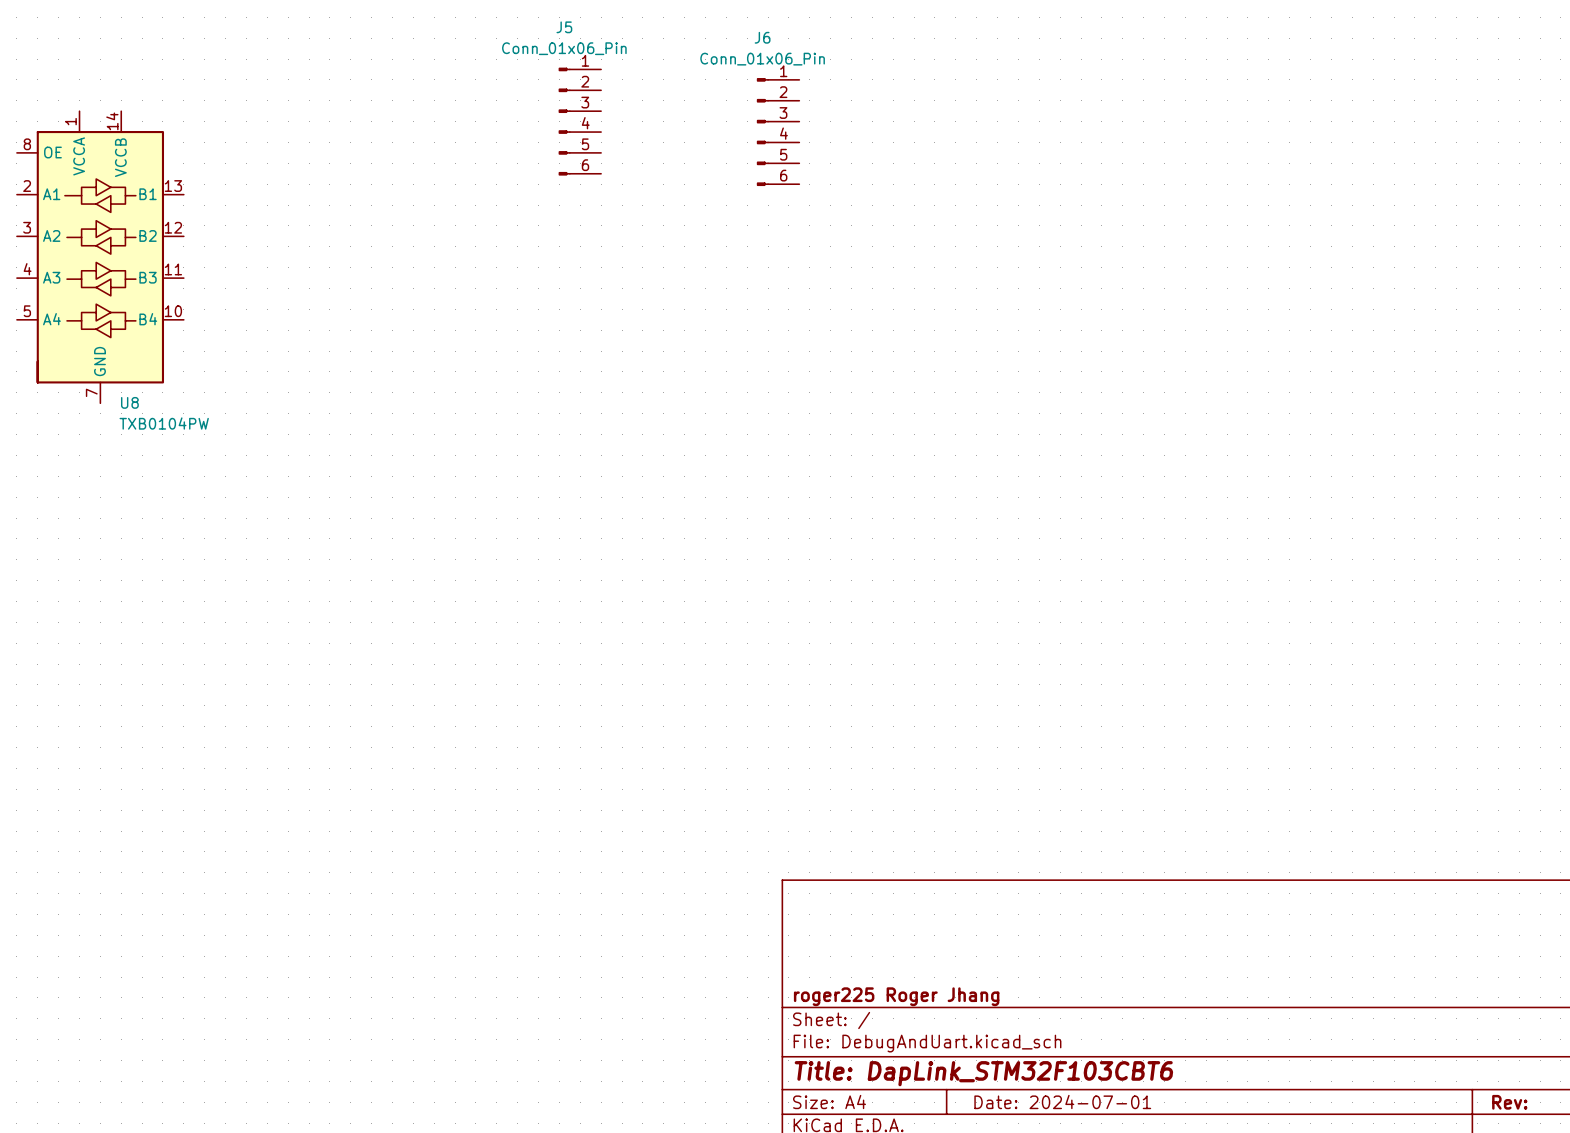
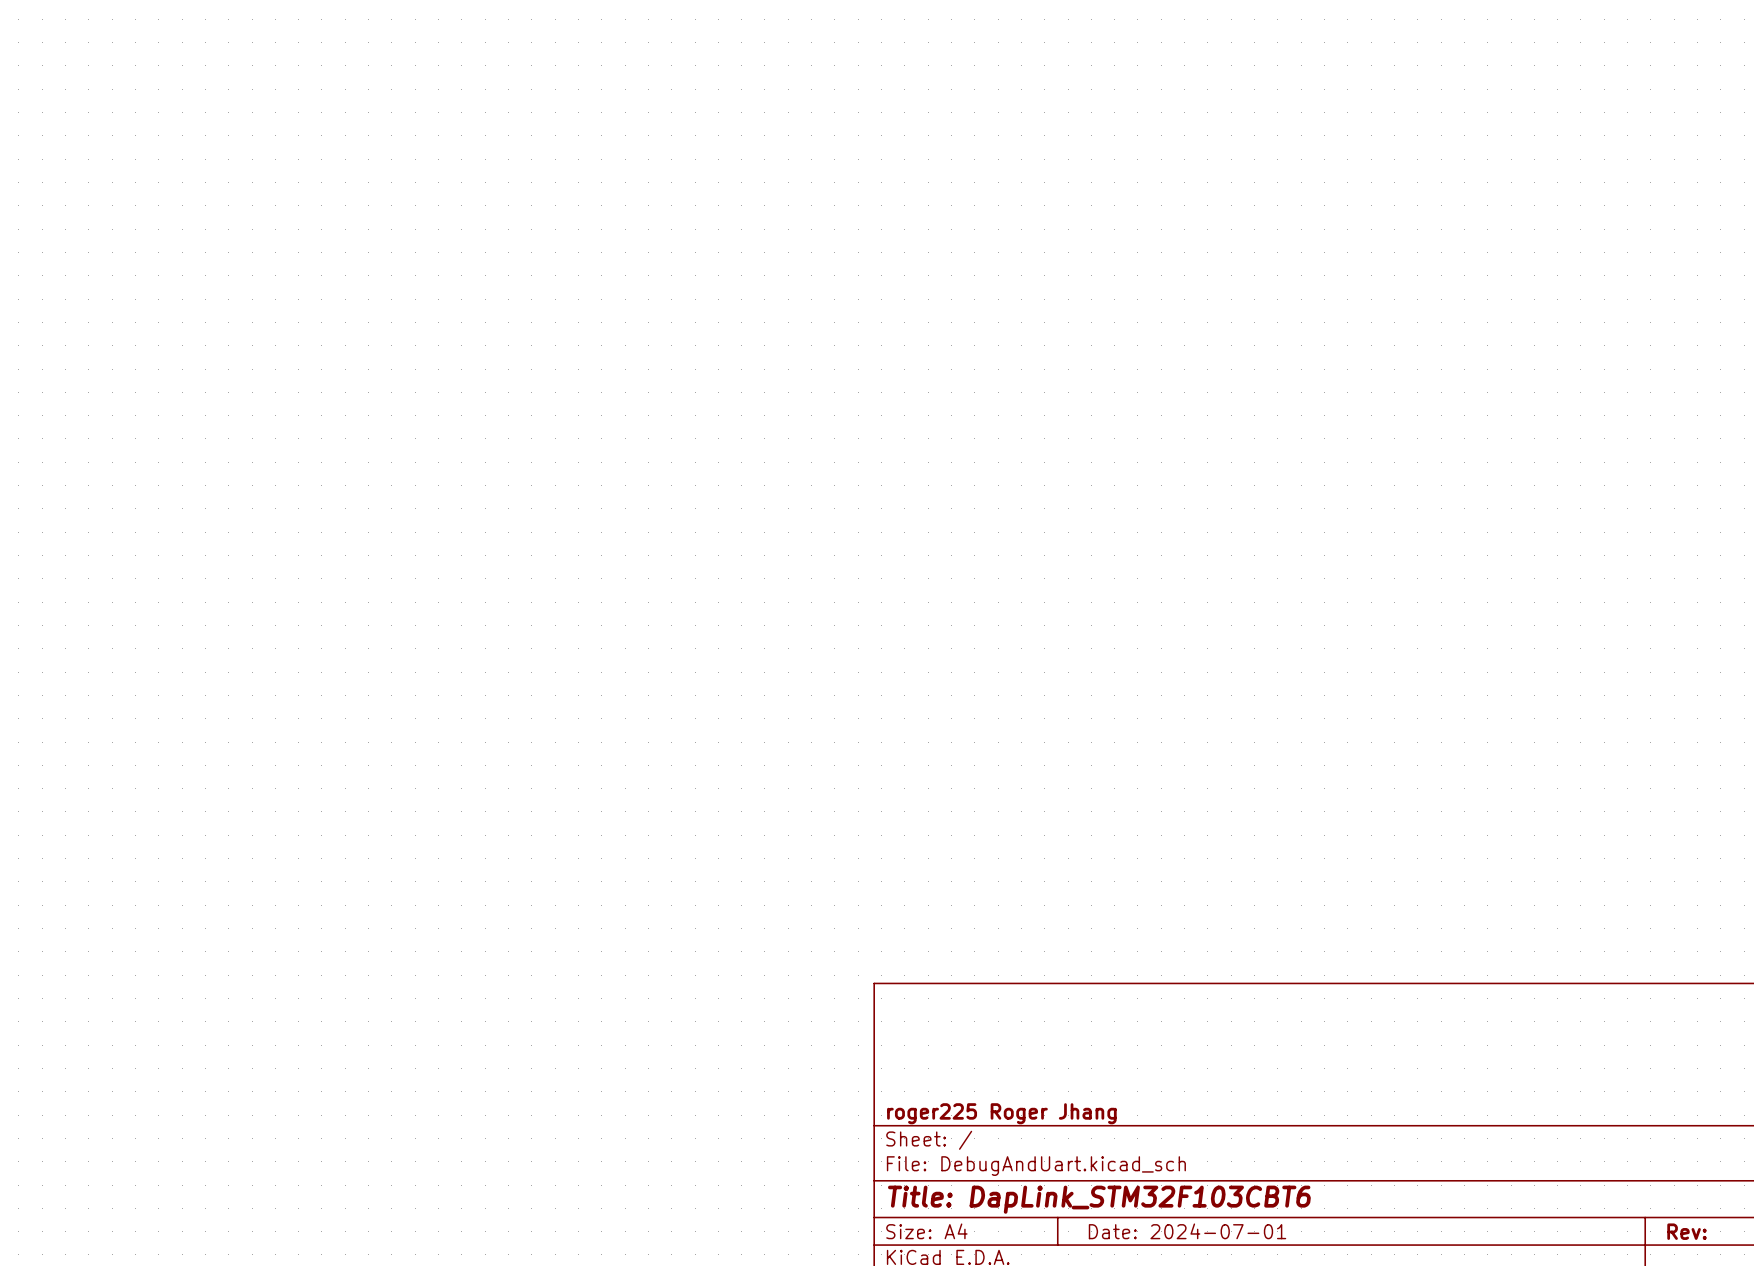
J5: Conn_01x06_Pin (579, 121) -> none
J6: Conn_01x06_Pin (778, 132) -> none
U8: TXB0104PW (100, 257) -> none

